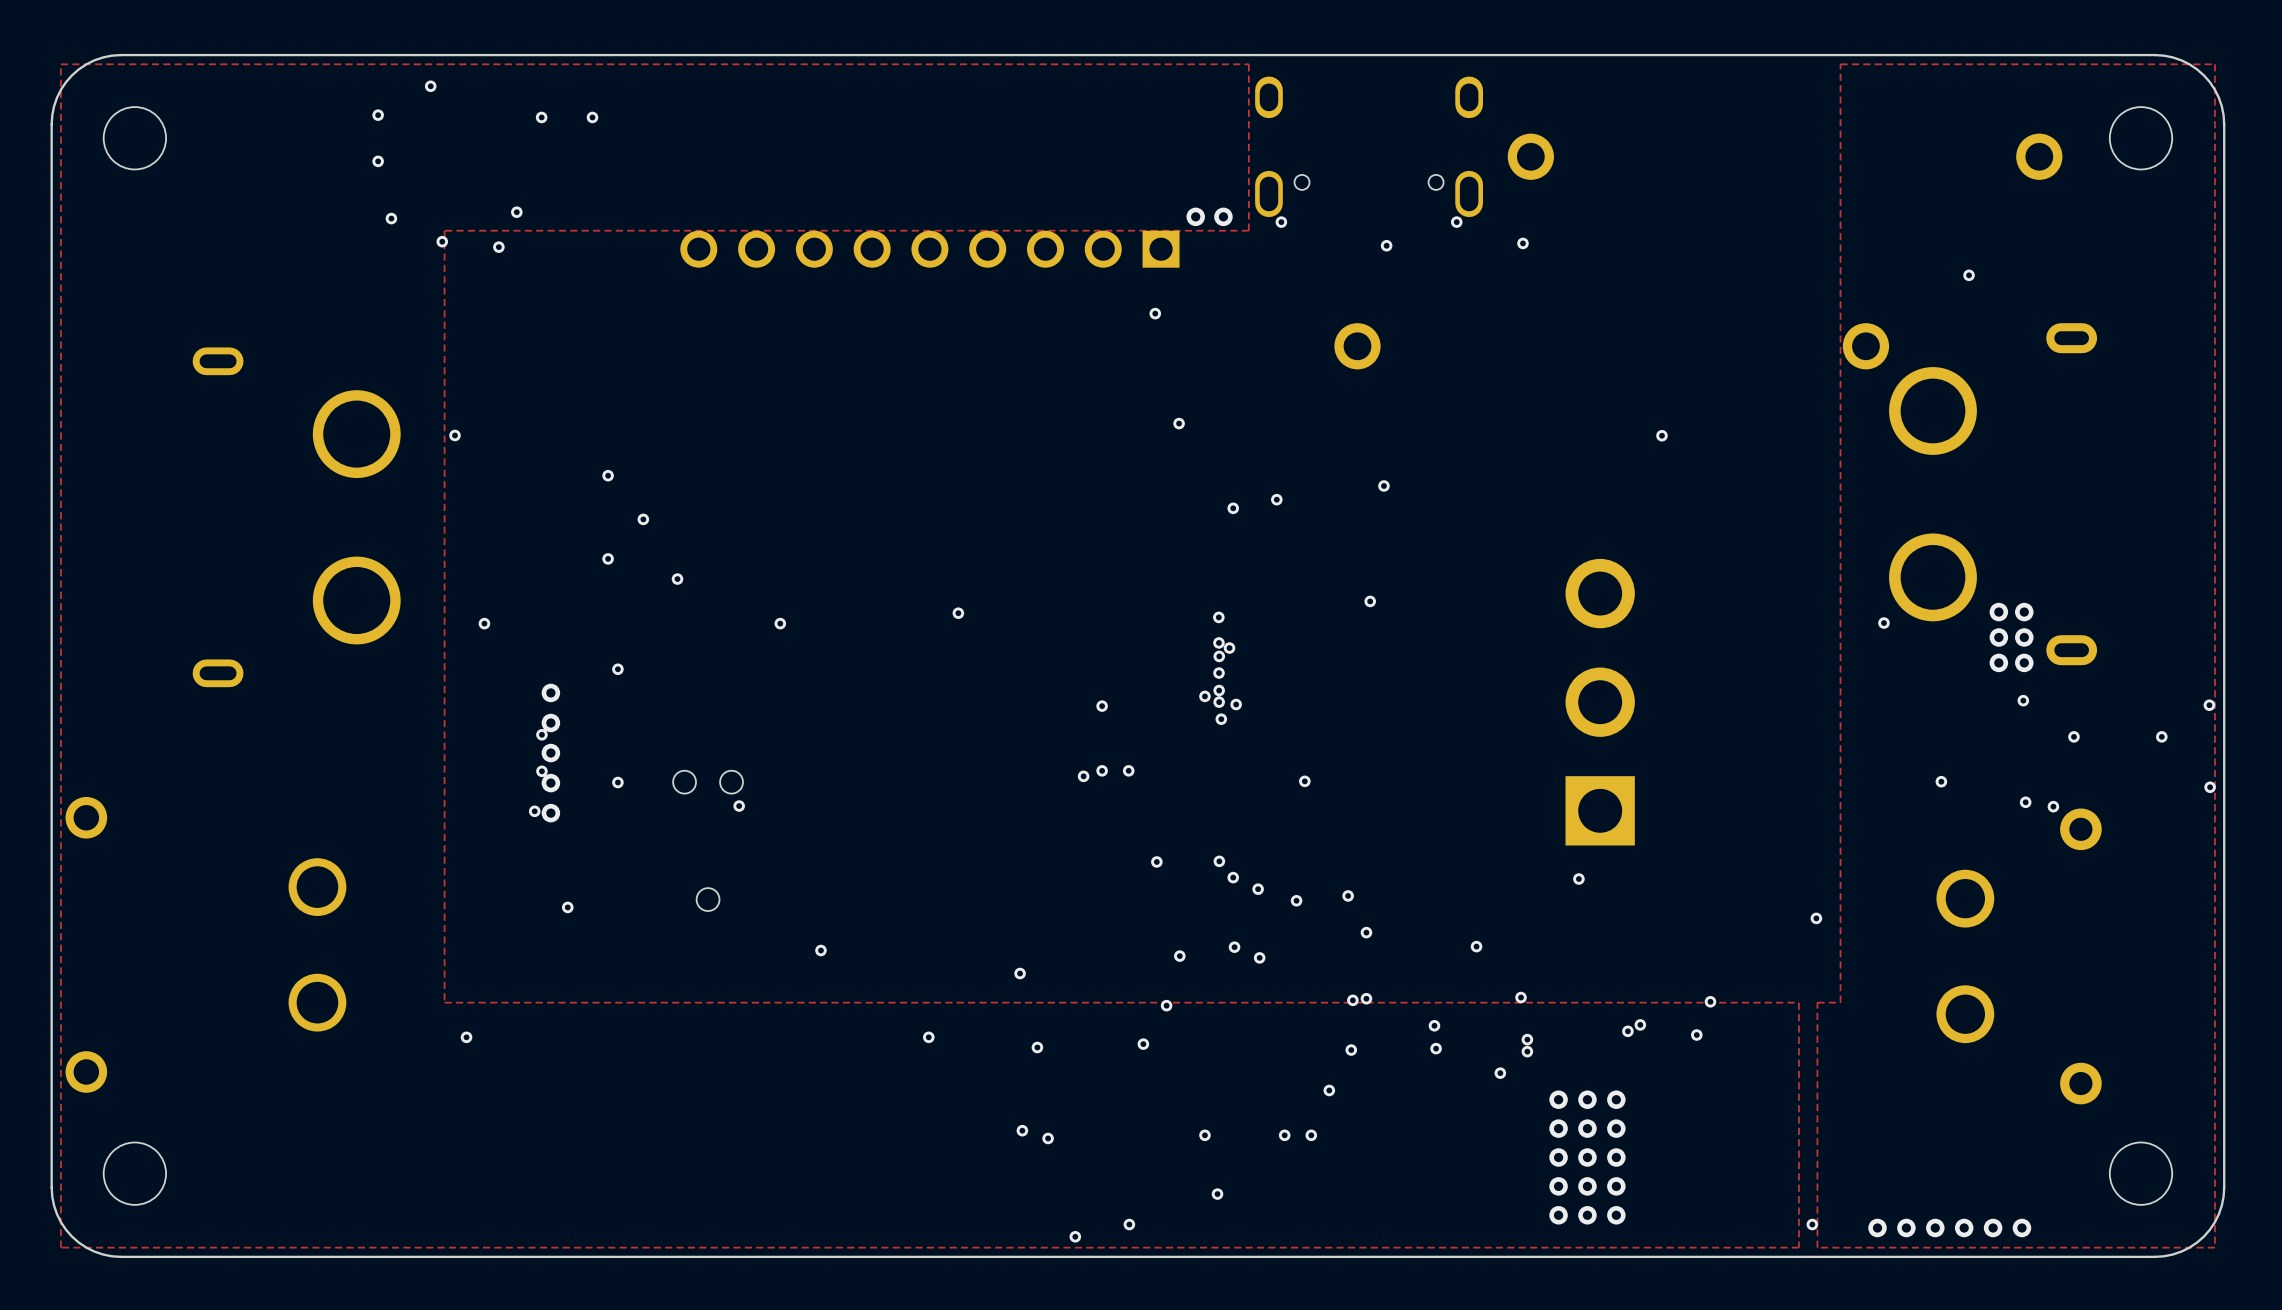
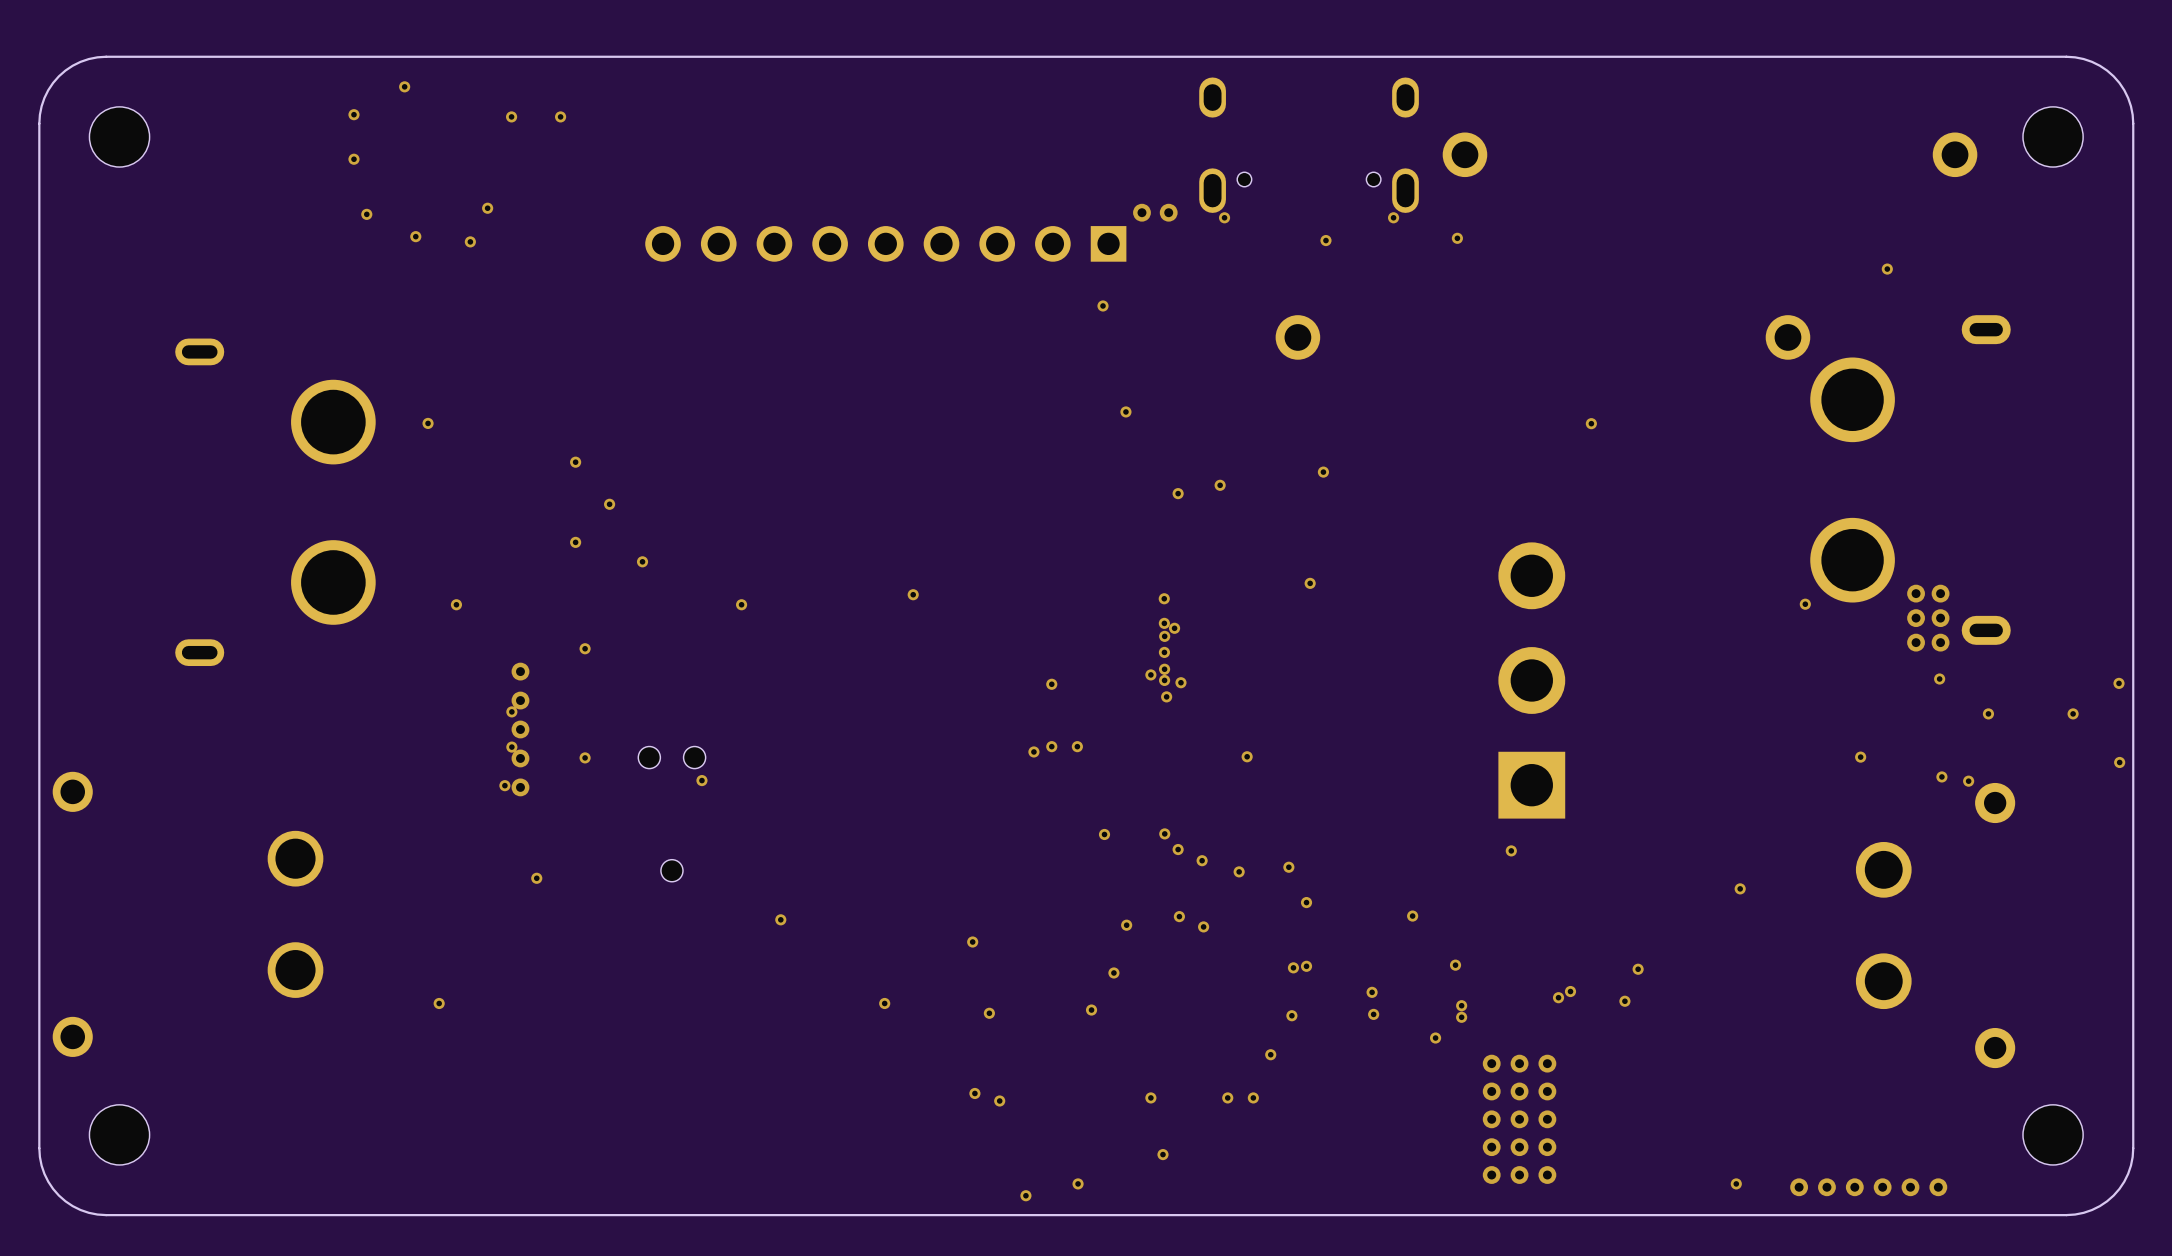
zone outline: (60, 64) (1248, 64) (1248, 230) (444, 230) (444, 1002) (1798, 1002) (1798, 1247) (60, 1247) (60, 64) -> none
zone outline: (1840, 64) (2214, 64) (2214, 1247) (1817, 1247) (1817, 1002) (1840, 1002) (1840, 64) -> none

